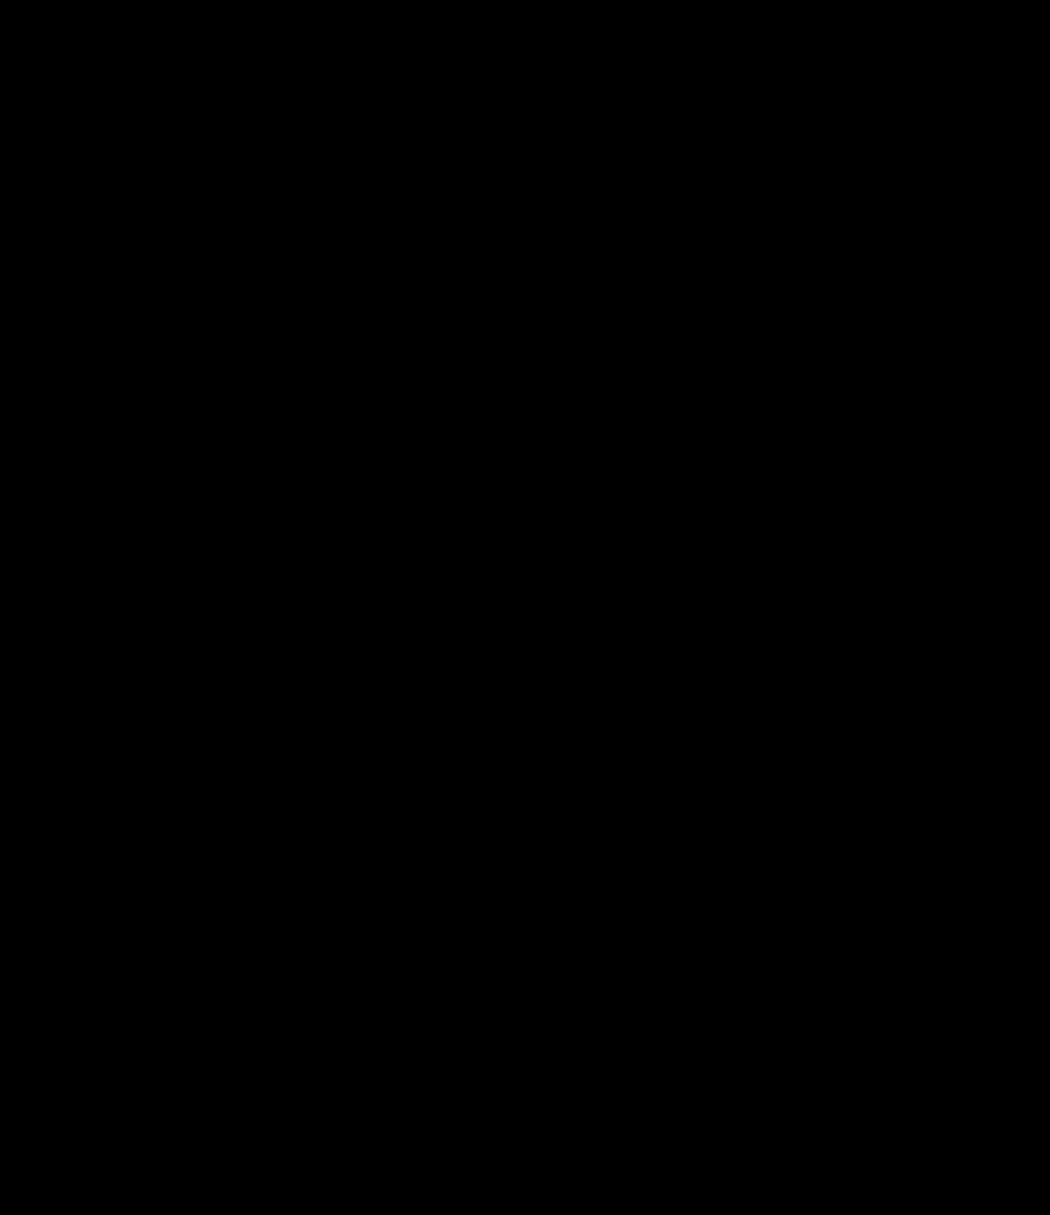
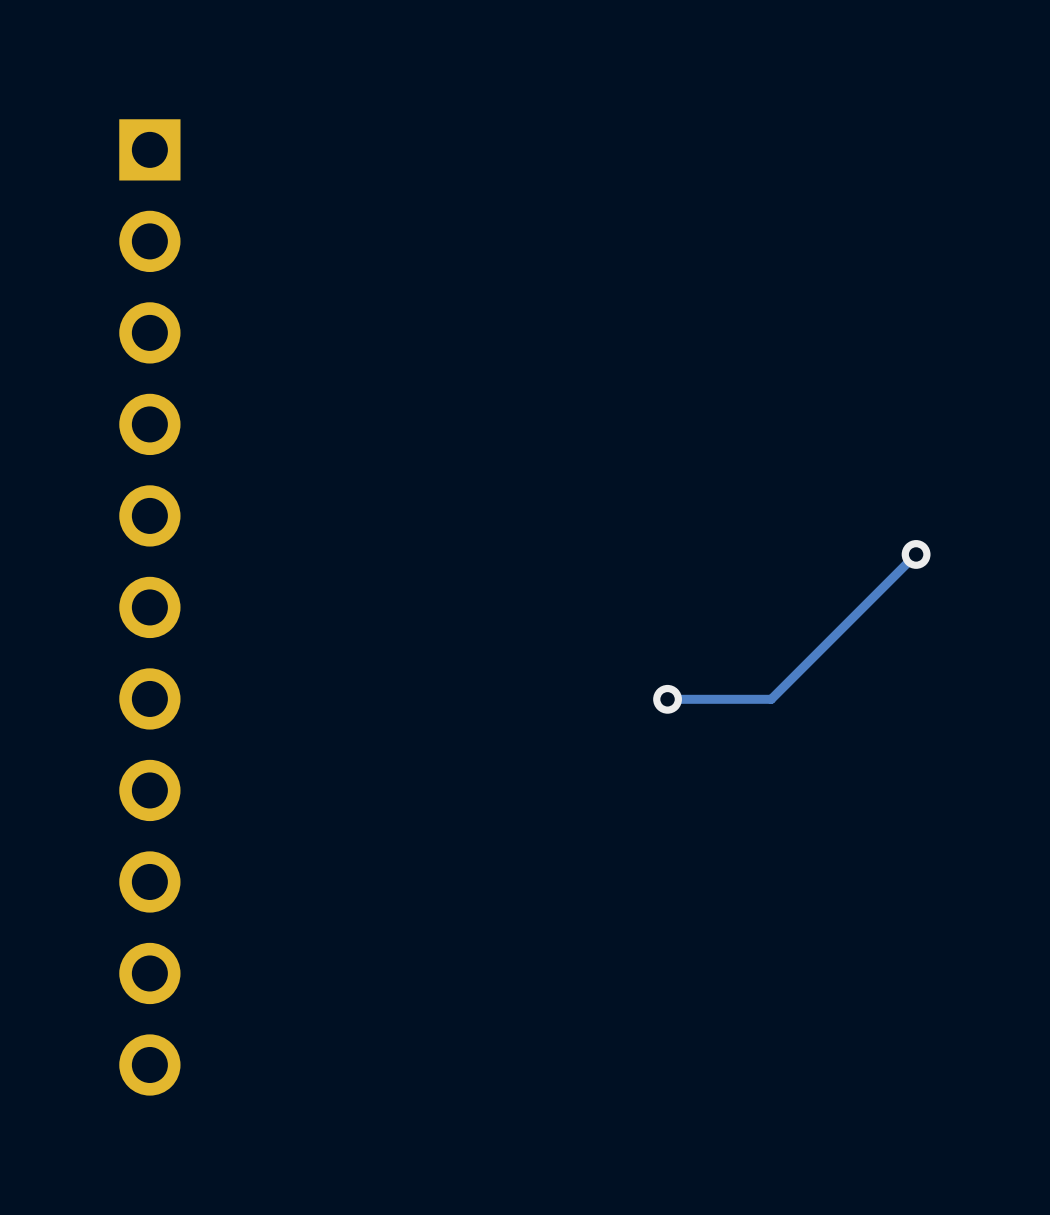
track: none -> (916, 554) (771, 699) (667, 699)
via: none -> (916, 554)
part: none -> (149, 607)
via: none -> (667, 699)

